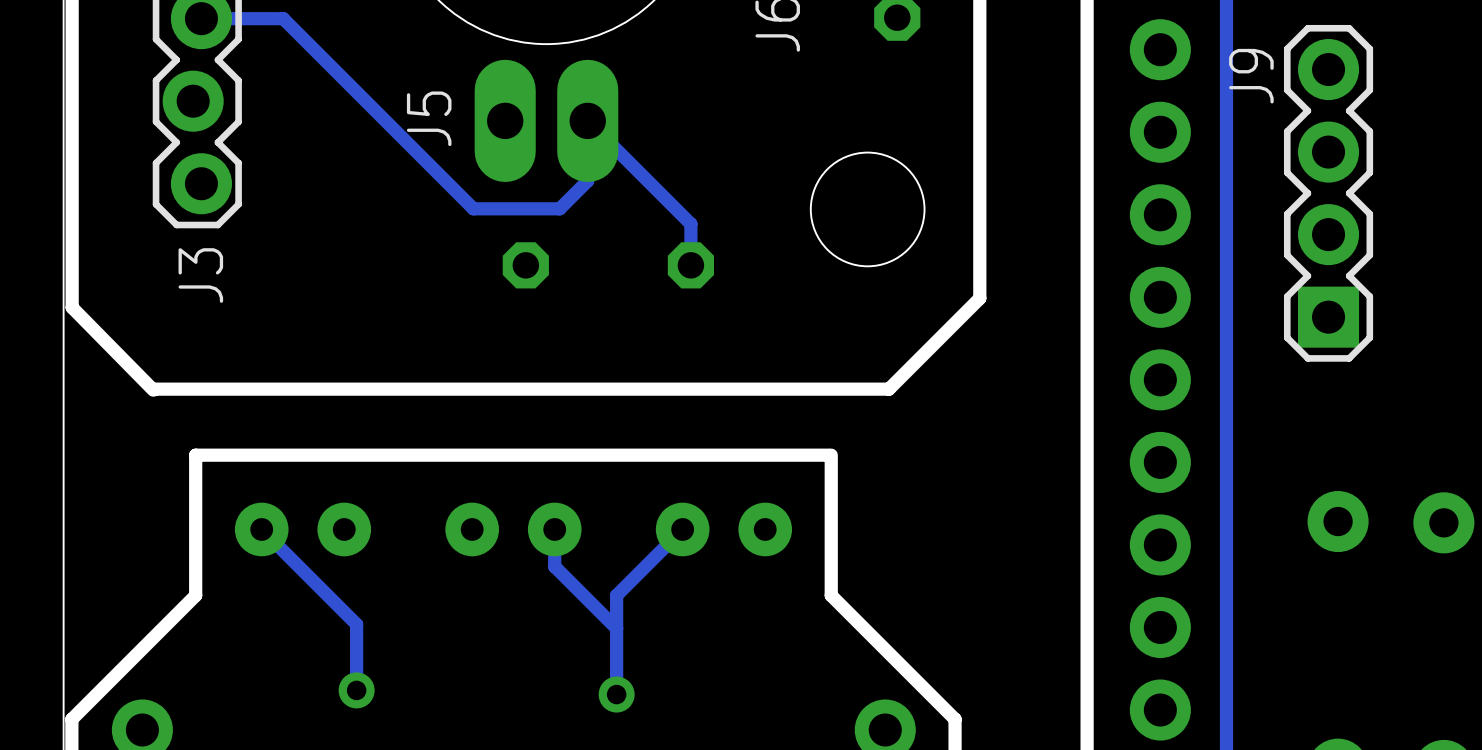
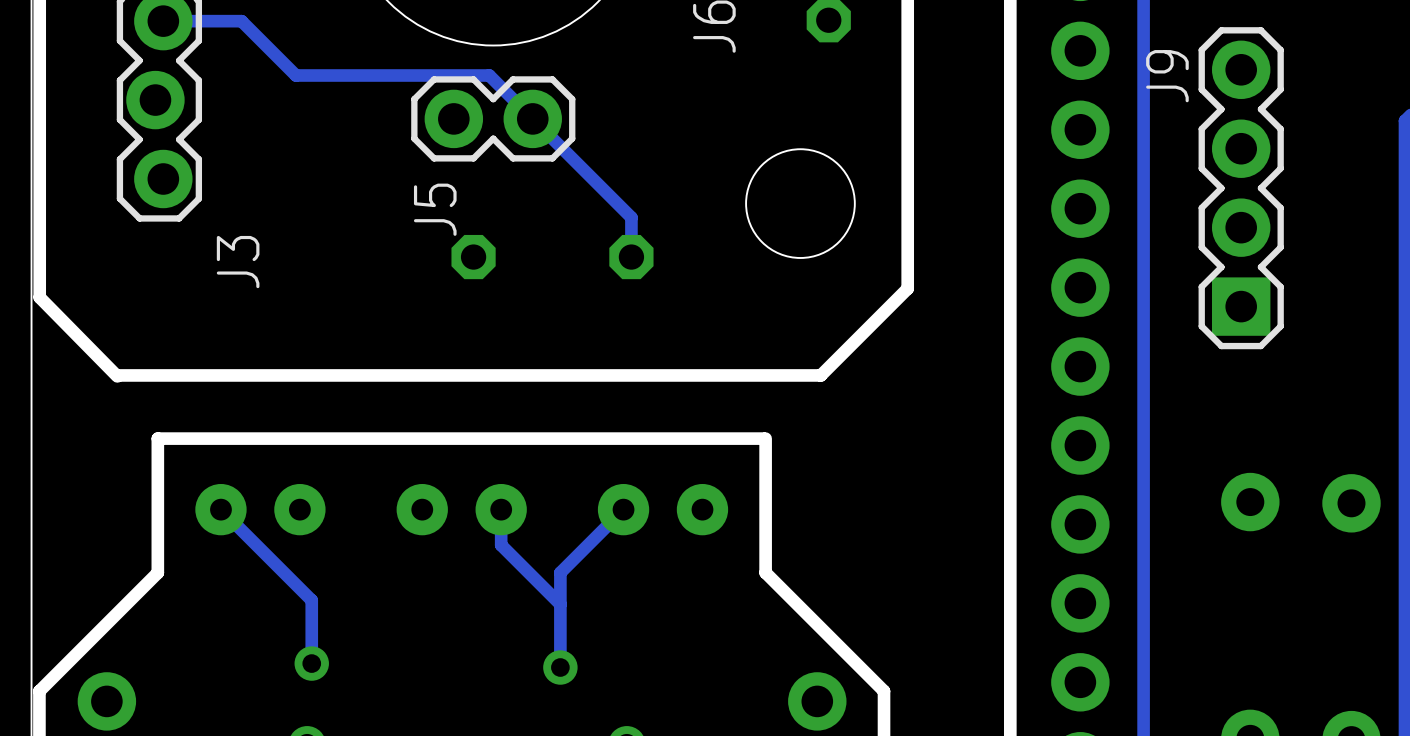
part footprint: [474, 59, 619, 182] -> [411, 76, 576, 162]
track: (340, 75) (473, 208) (559, 208) (587, 180) (587, 120) -> (295, 75) (489, 75) (532, 118)
text position: J5 (429, 118) -> J5 (435, 209)
text position: J3 (200, 275) -> J3 (238, 262)

